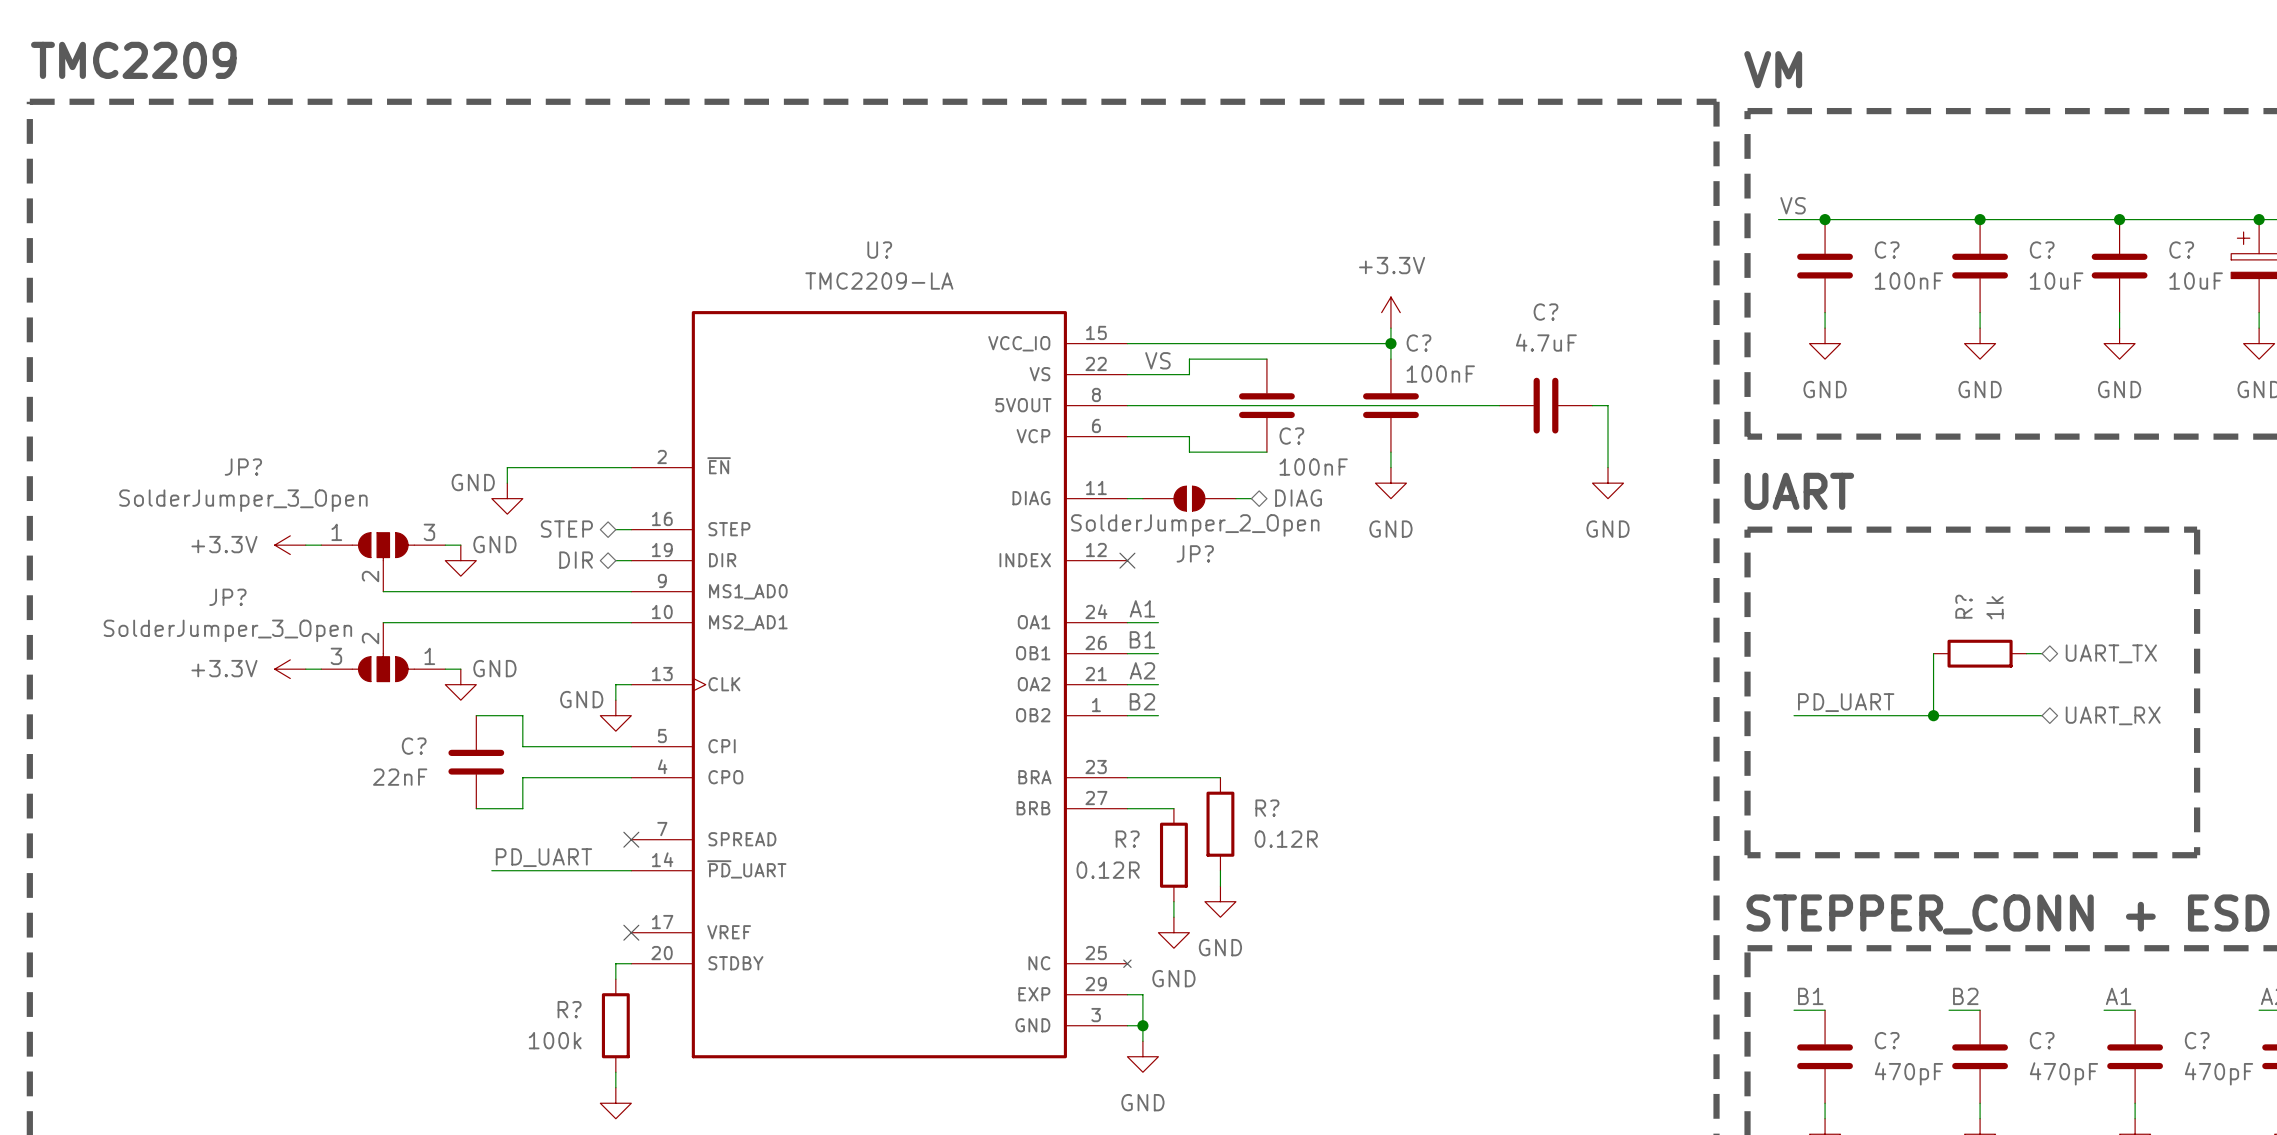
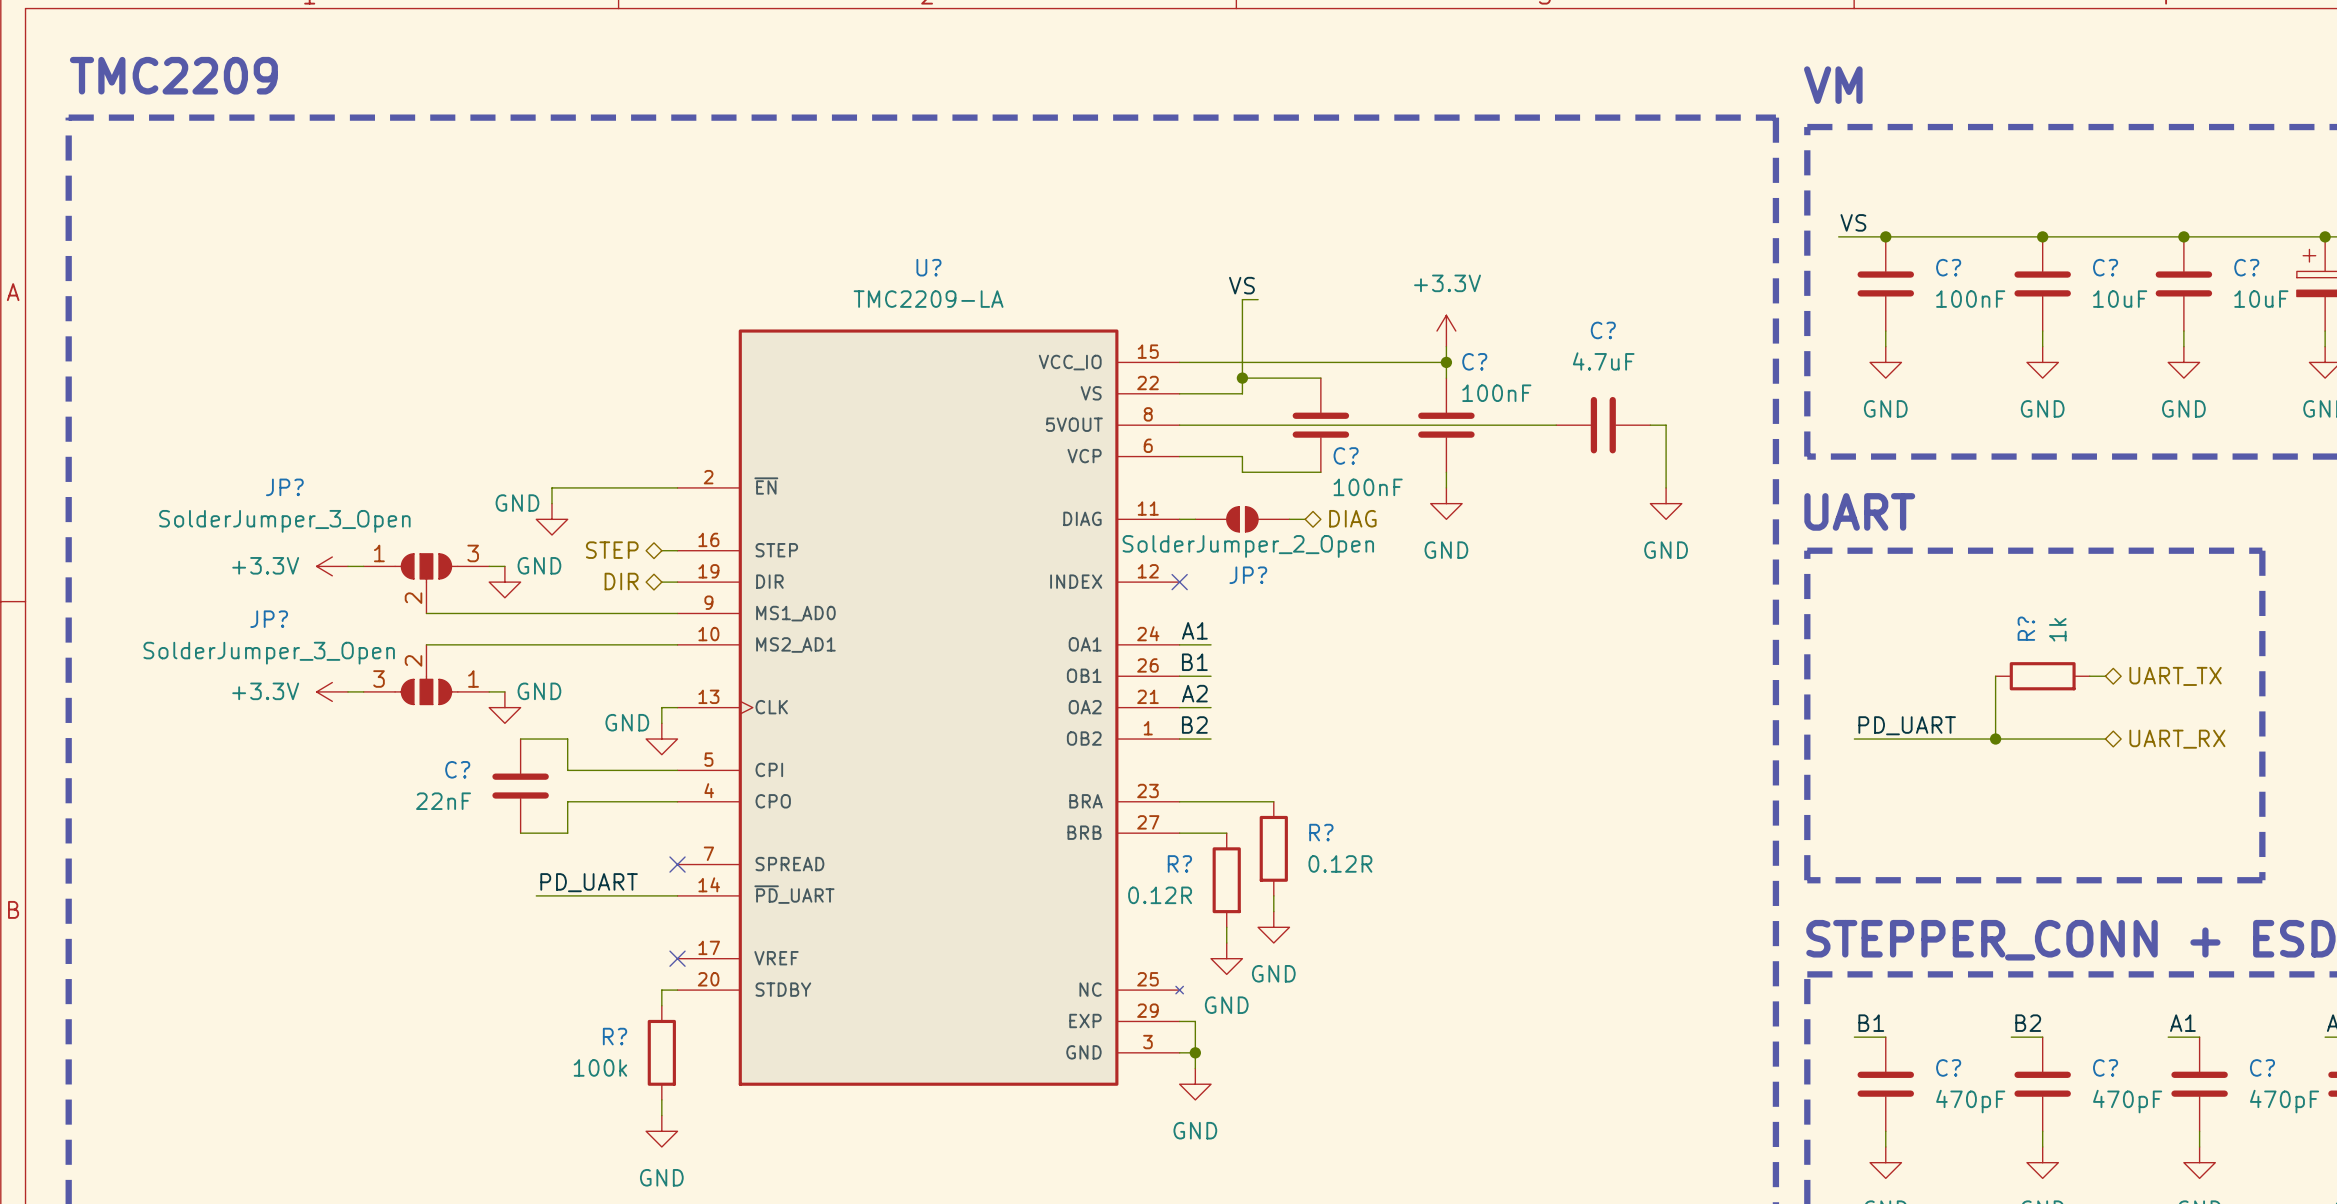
wire: none -> (1258, 299) (1242, 299) (1242, 378)
junction: none -> (1242, 378)
label position: VS (1157, 360) -> VS (1241, 285)

